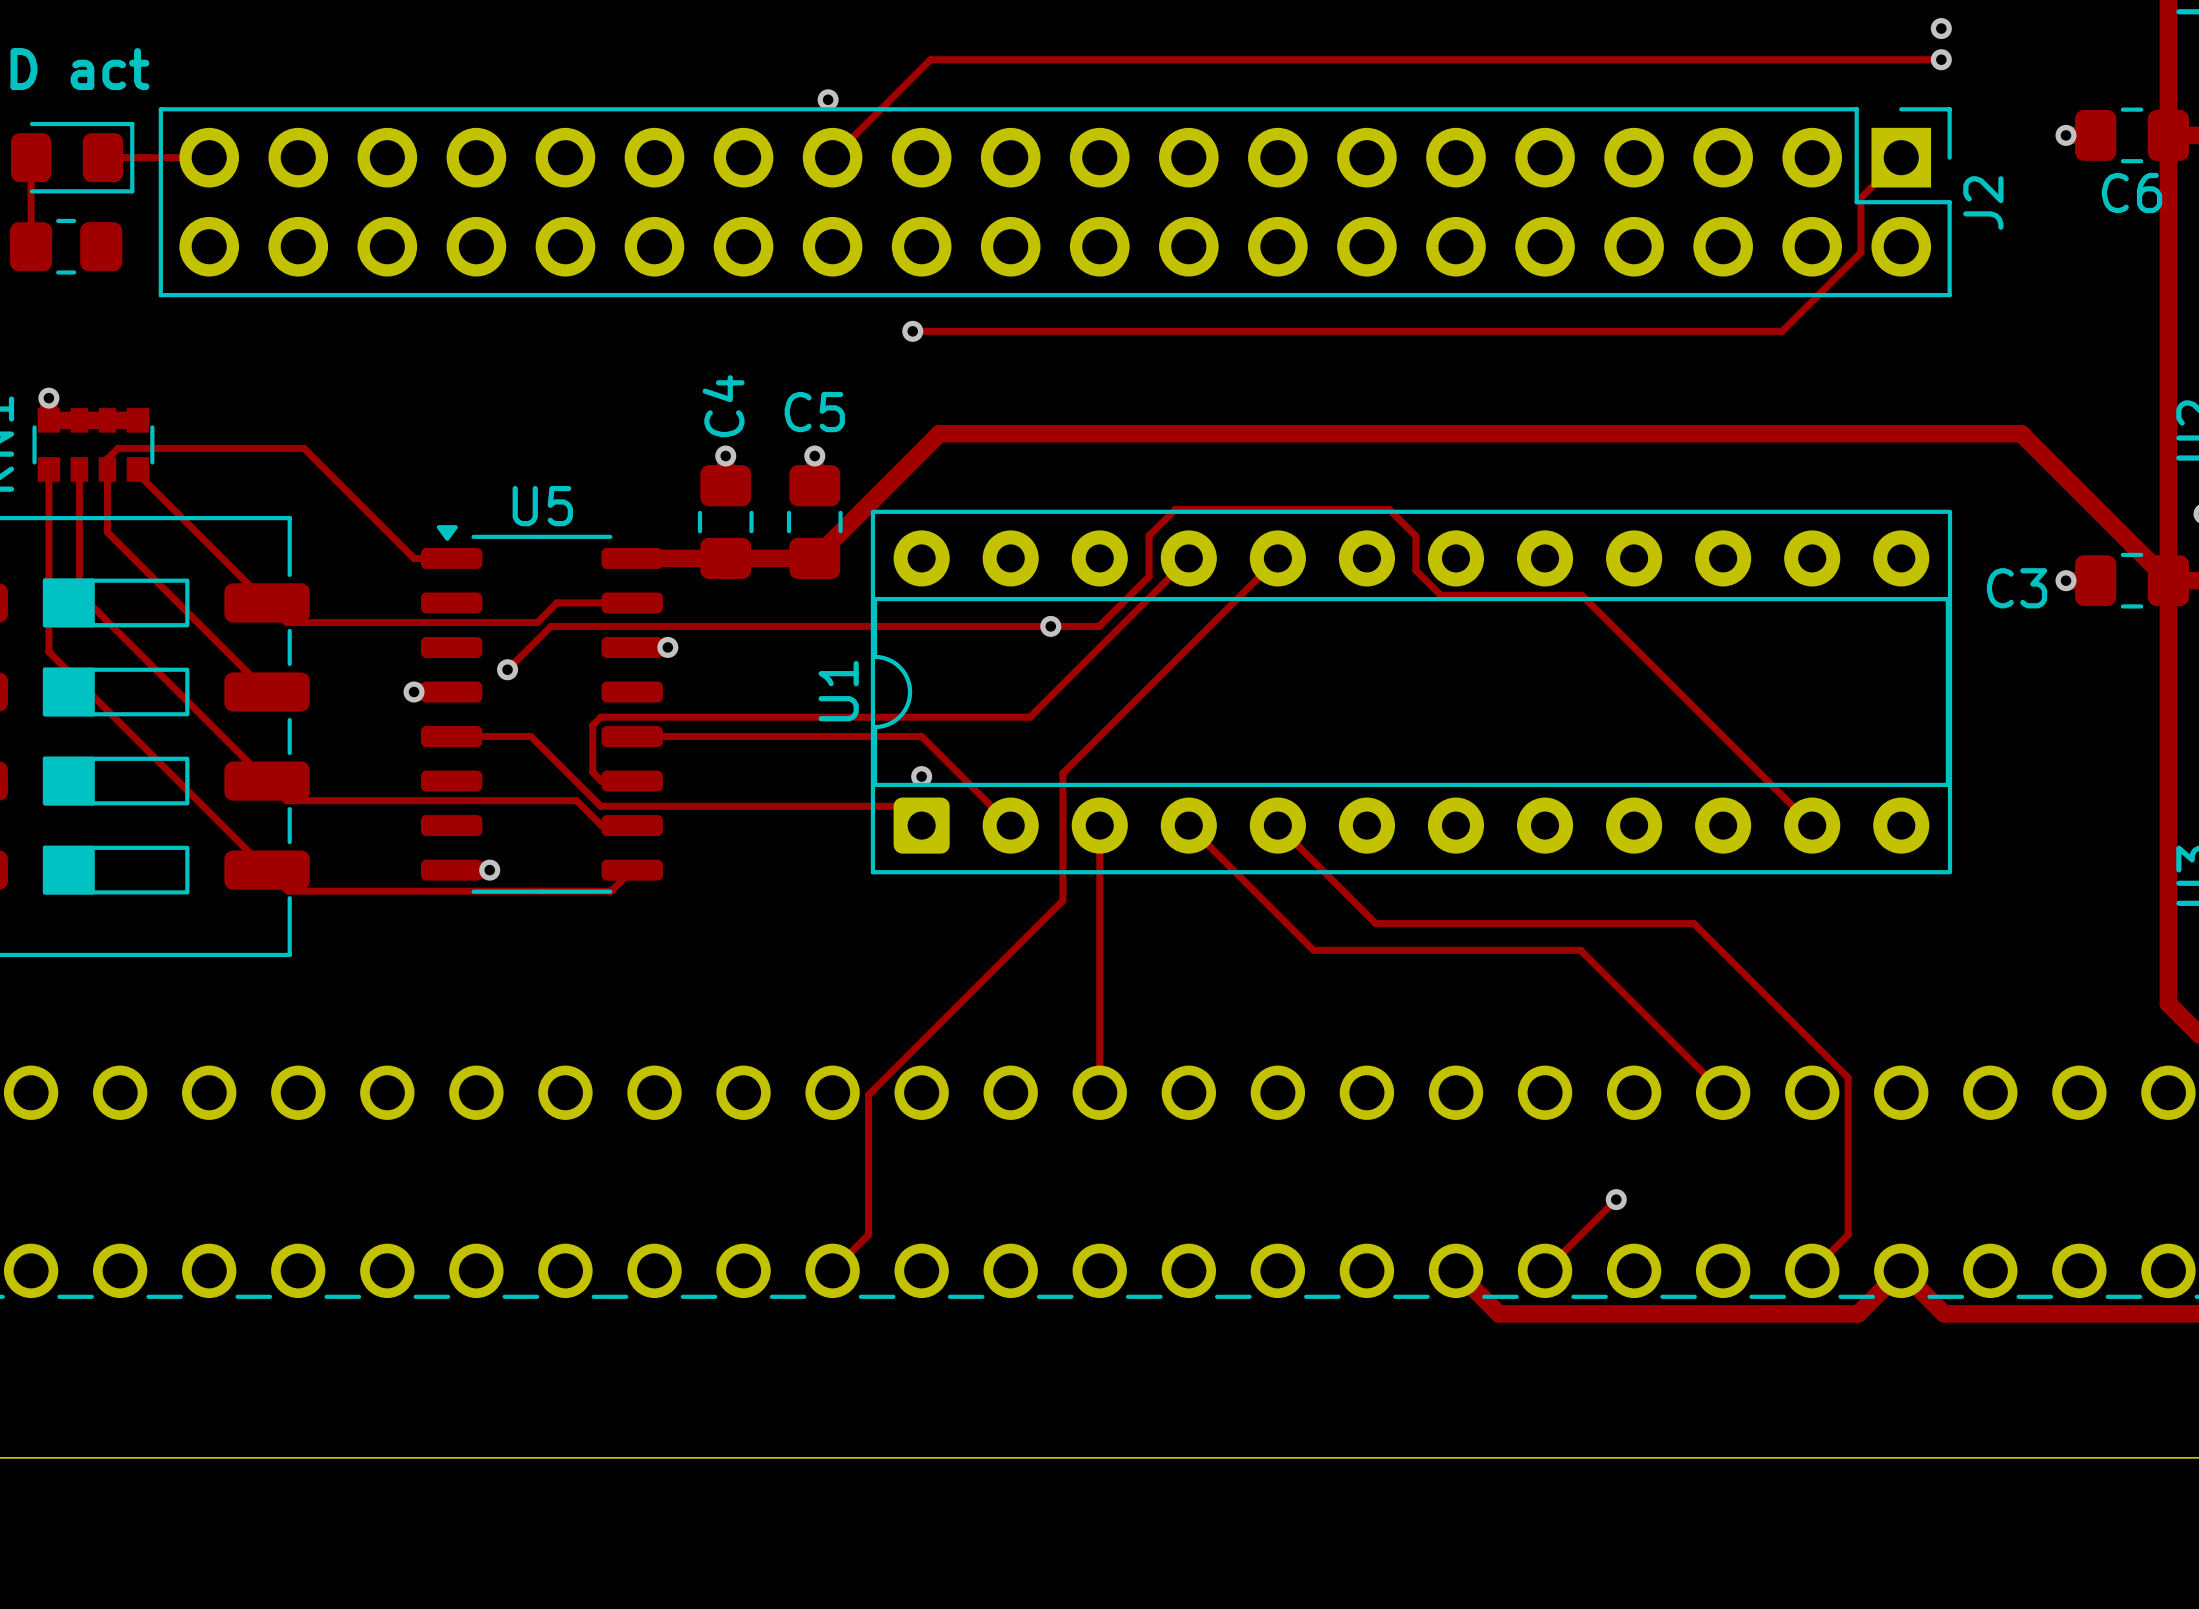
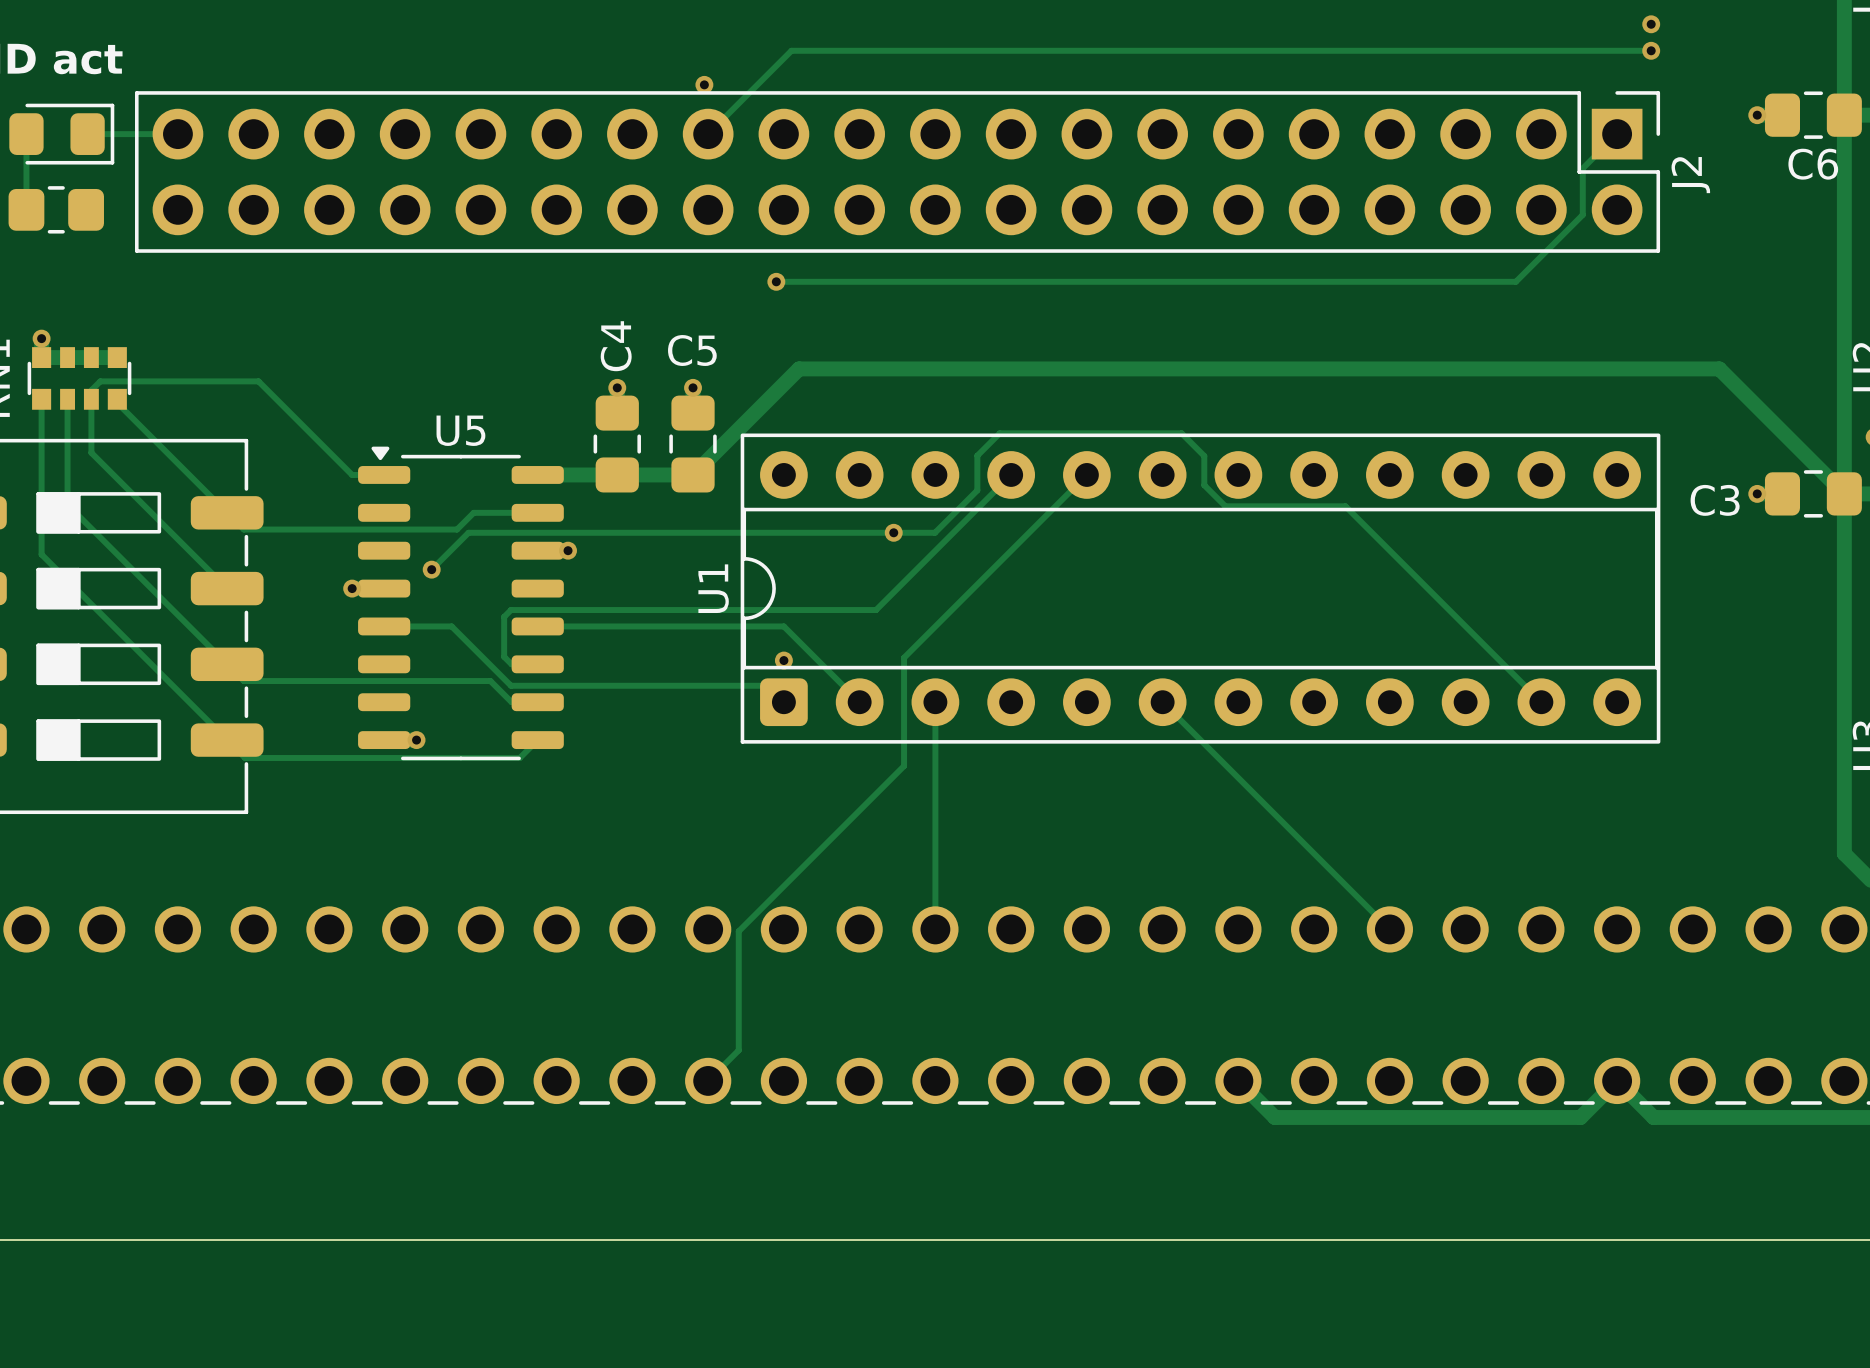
track: (1188, 825) (1313, 950) (1580, 950) (1723, 1092) -> none
track: (1277, 825) (1375, 923) (1693, 923) (1848, 1077) (1848, 1234) (1812, 1270) -> none
track: none -> (1162, 702) (1389, 929)
track: (1616, 1199) (1545, 1270) -> none
via: (1616, 1199) -> none

